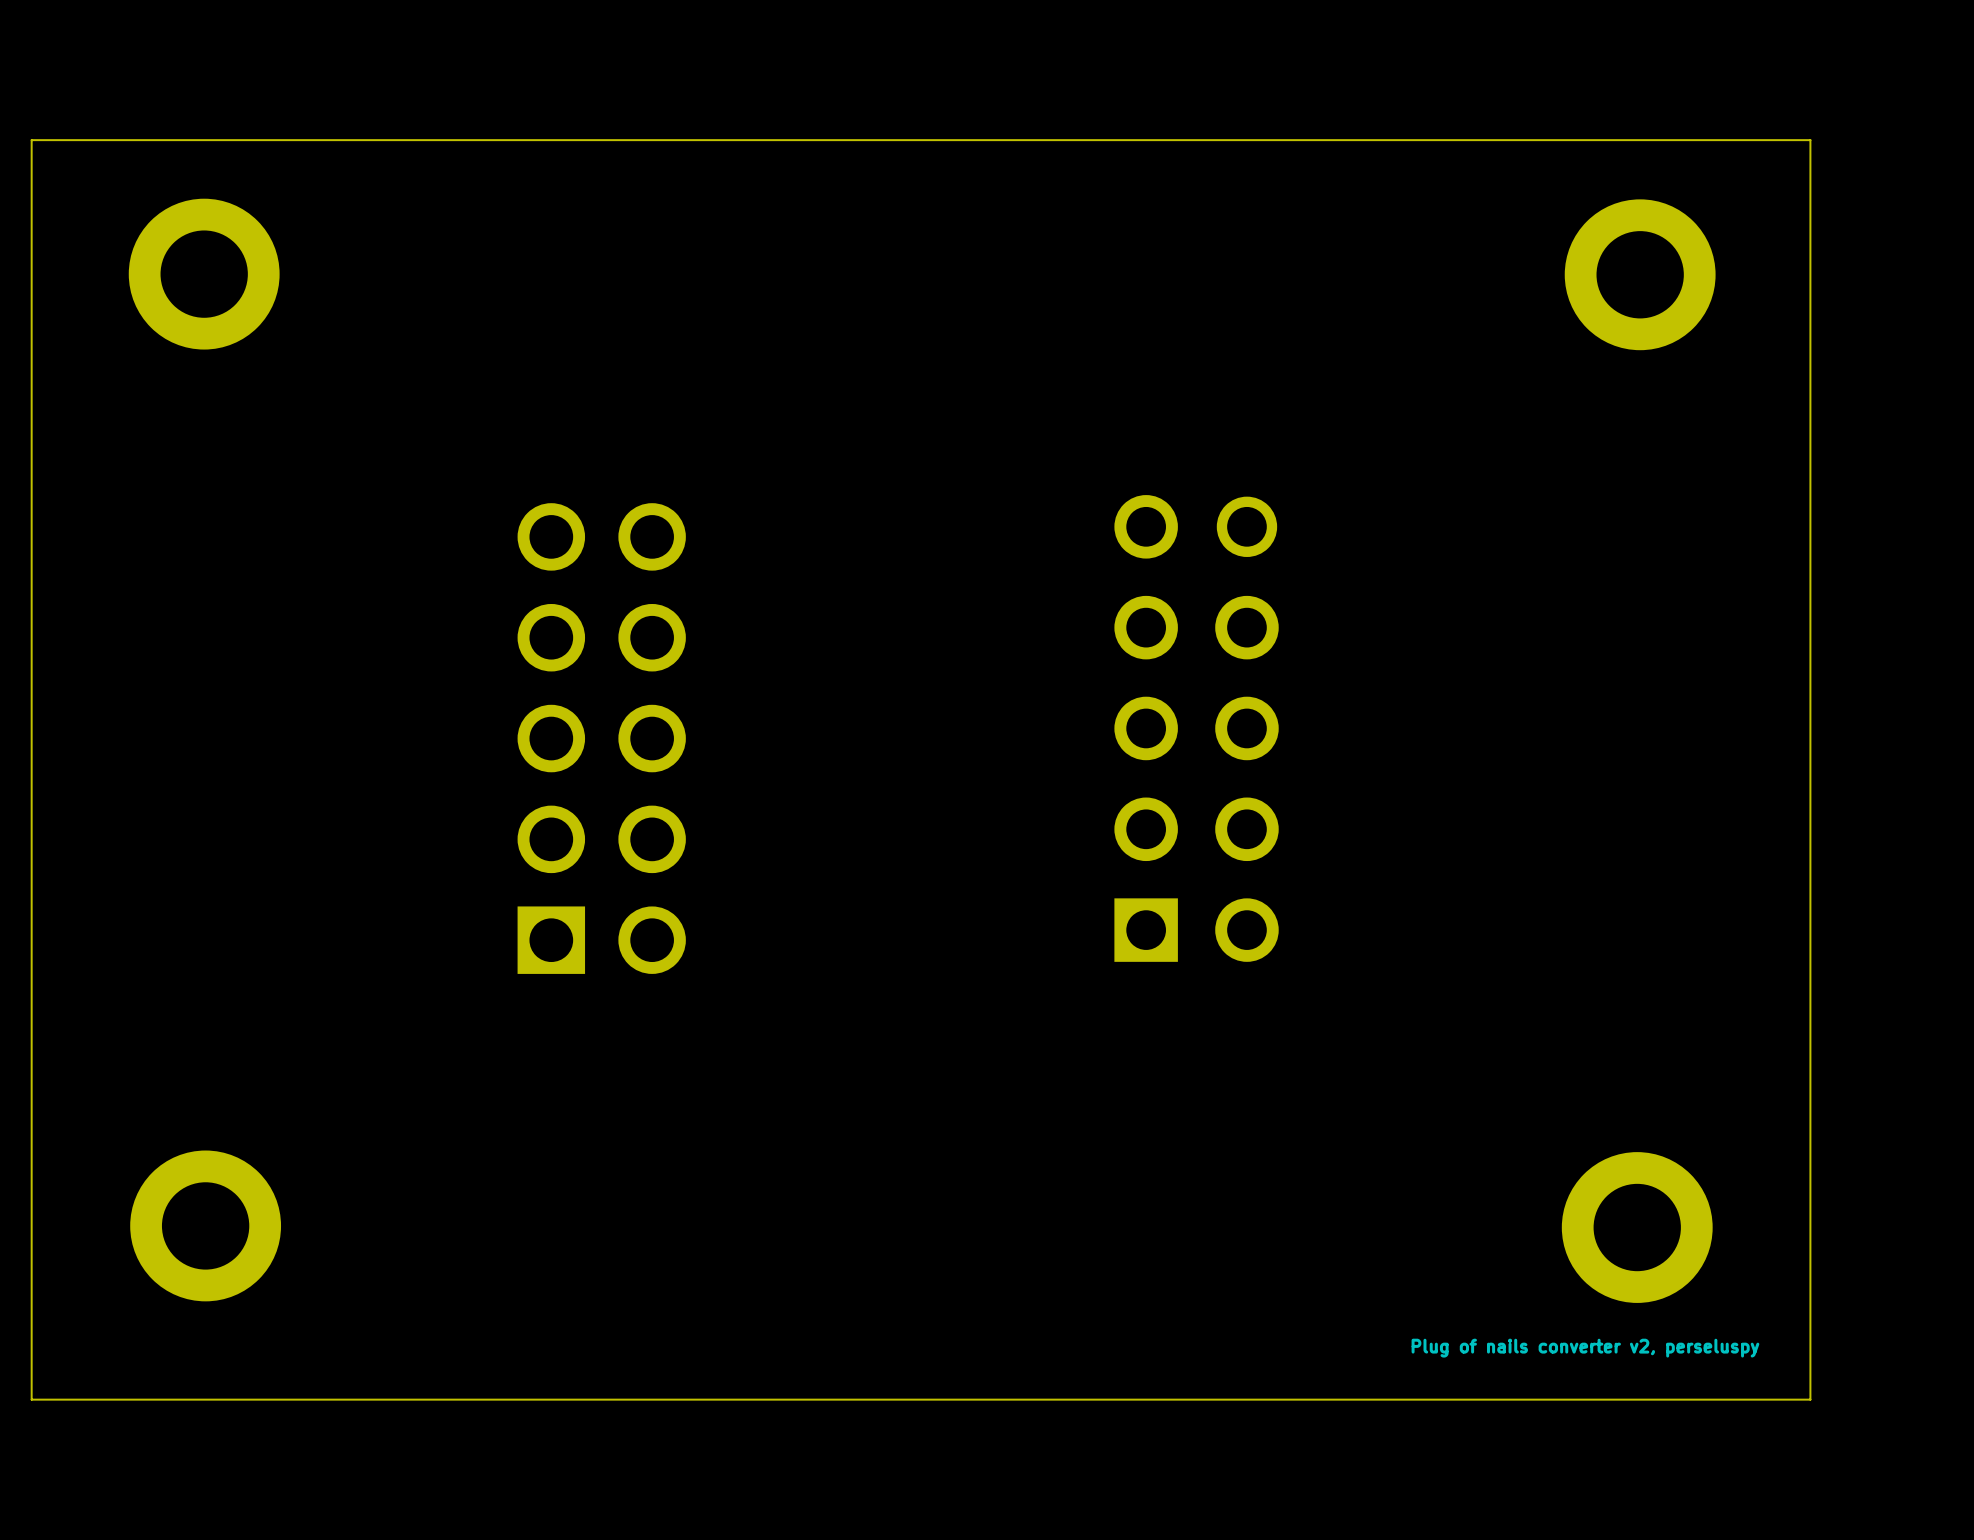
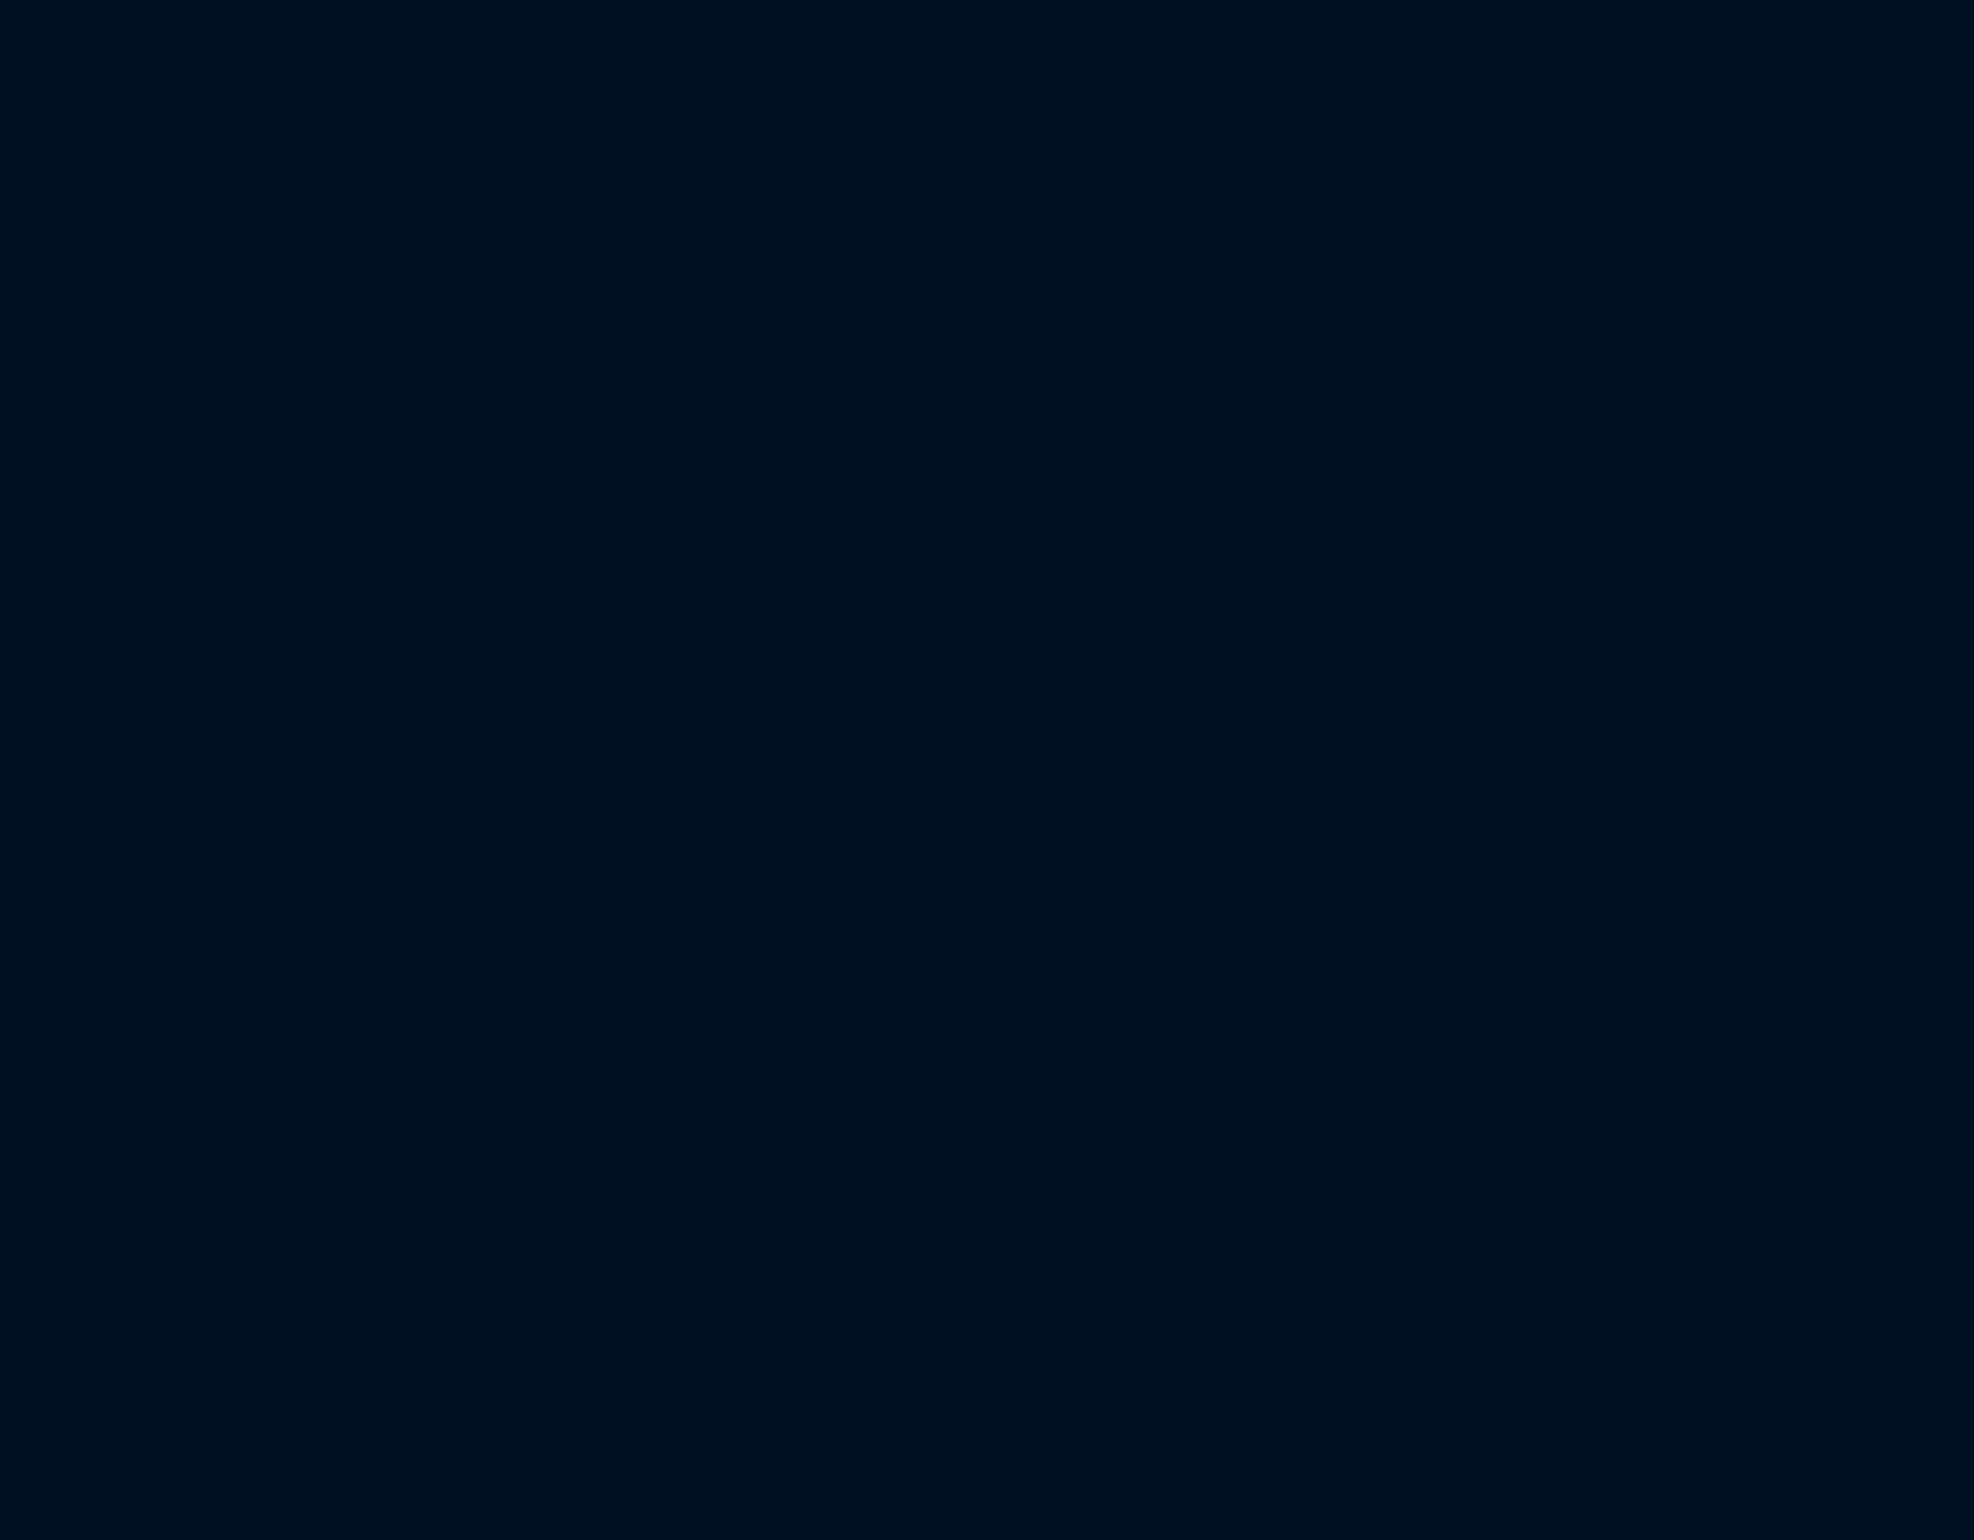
board edge: (1810, 140) (31, 140) (31, 1399) (1810, 1399) (1810, 140) -> none
part: (204, 274) -> none
part: (1640, 274) -> none
part: (1196, 728) -> none
part: (601, 738) -> none
part: (205, 1225) -> none
part: (1637, 1227) -> none
text: Plug of nails converter v2, perseluspy (1585, 1348) -> none

